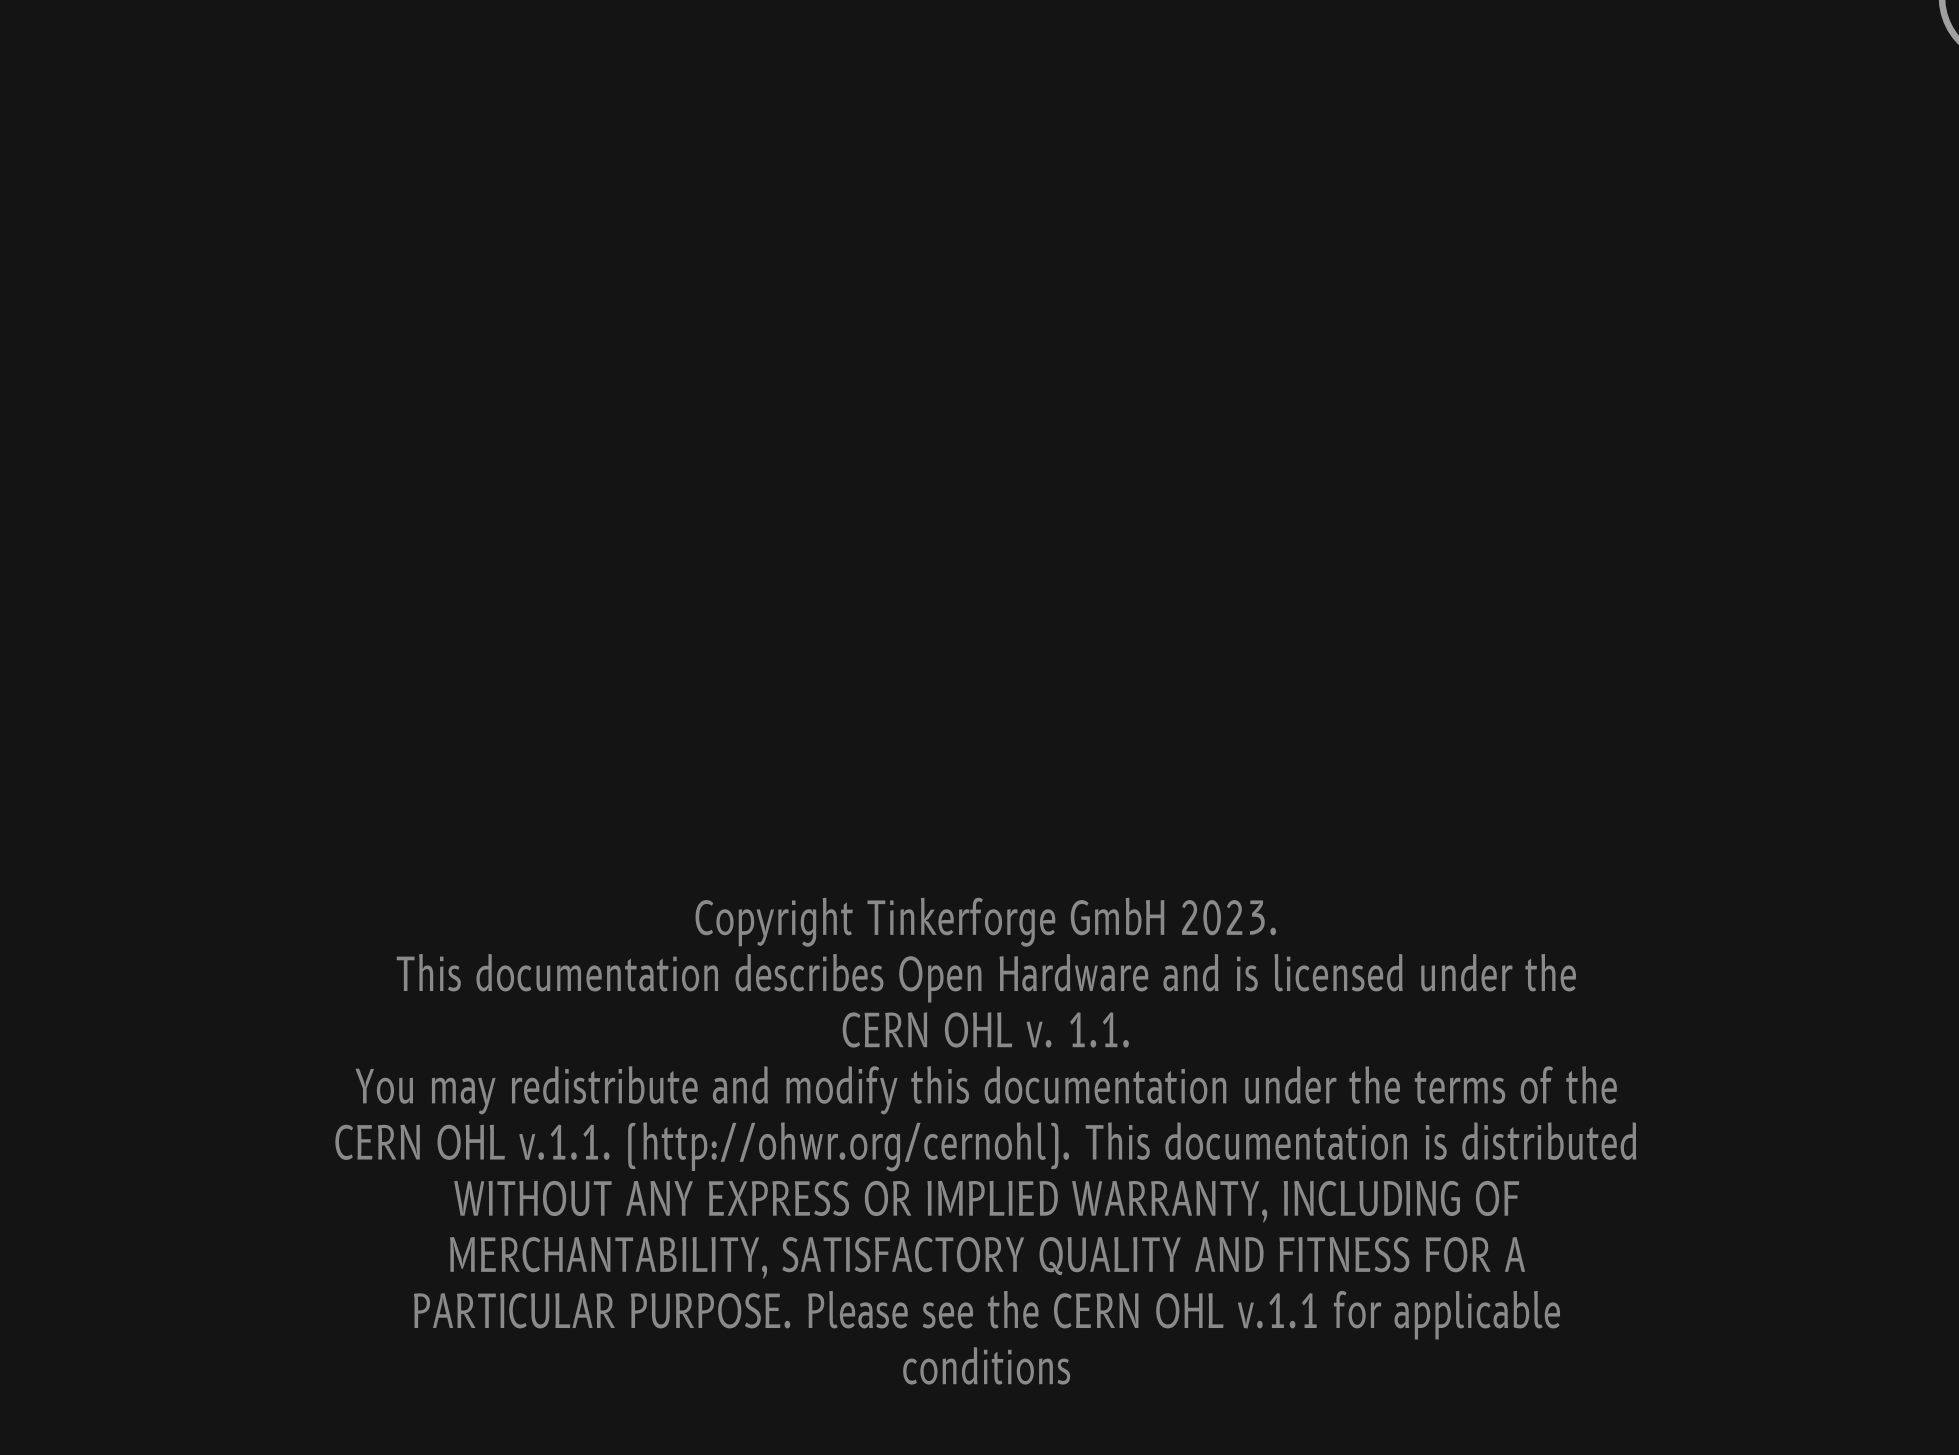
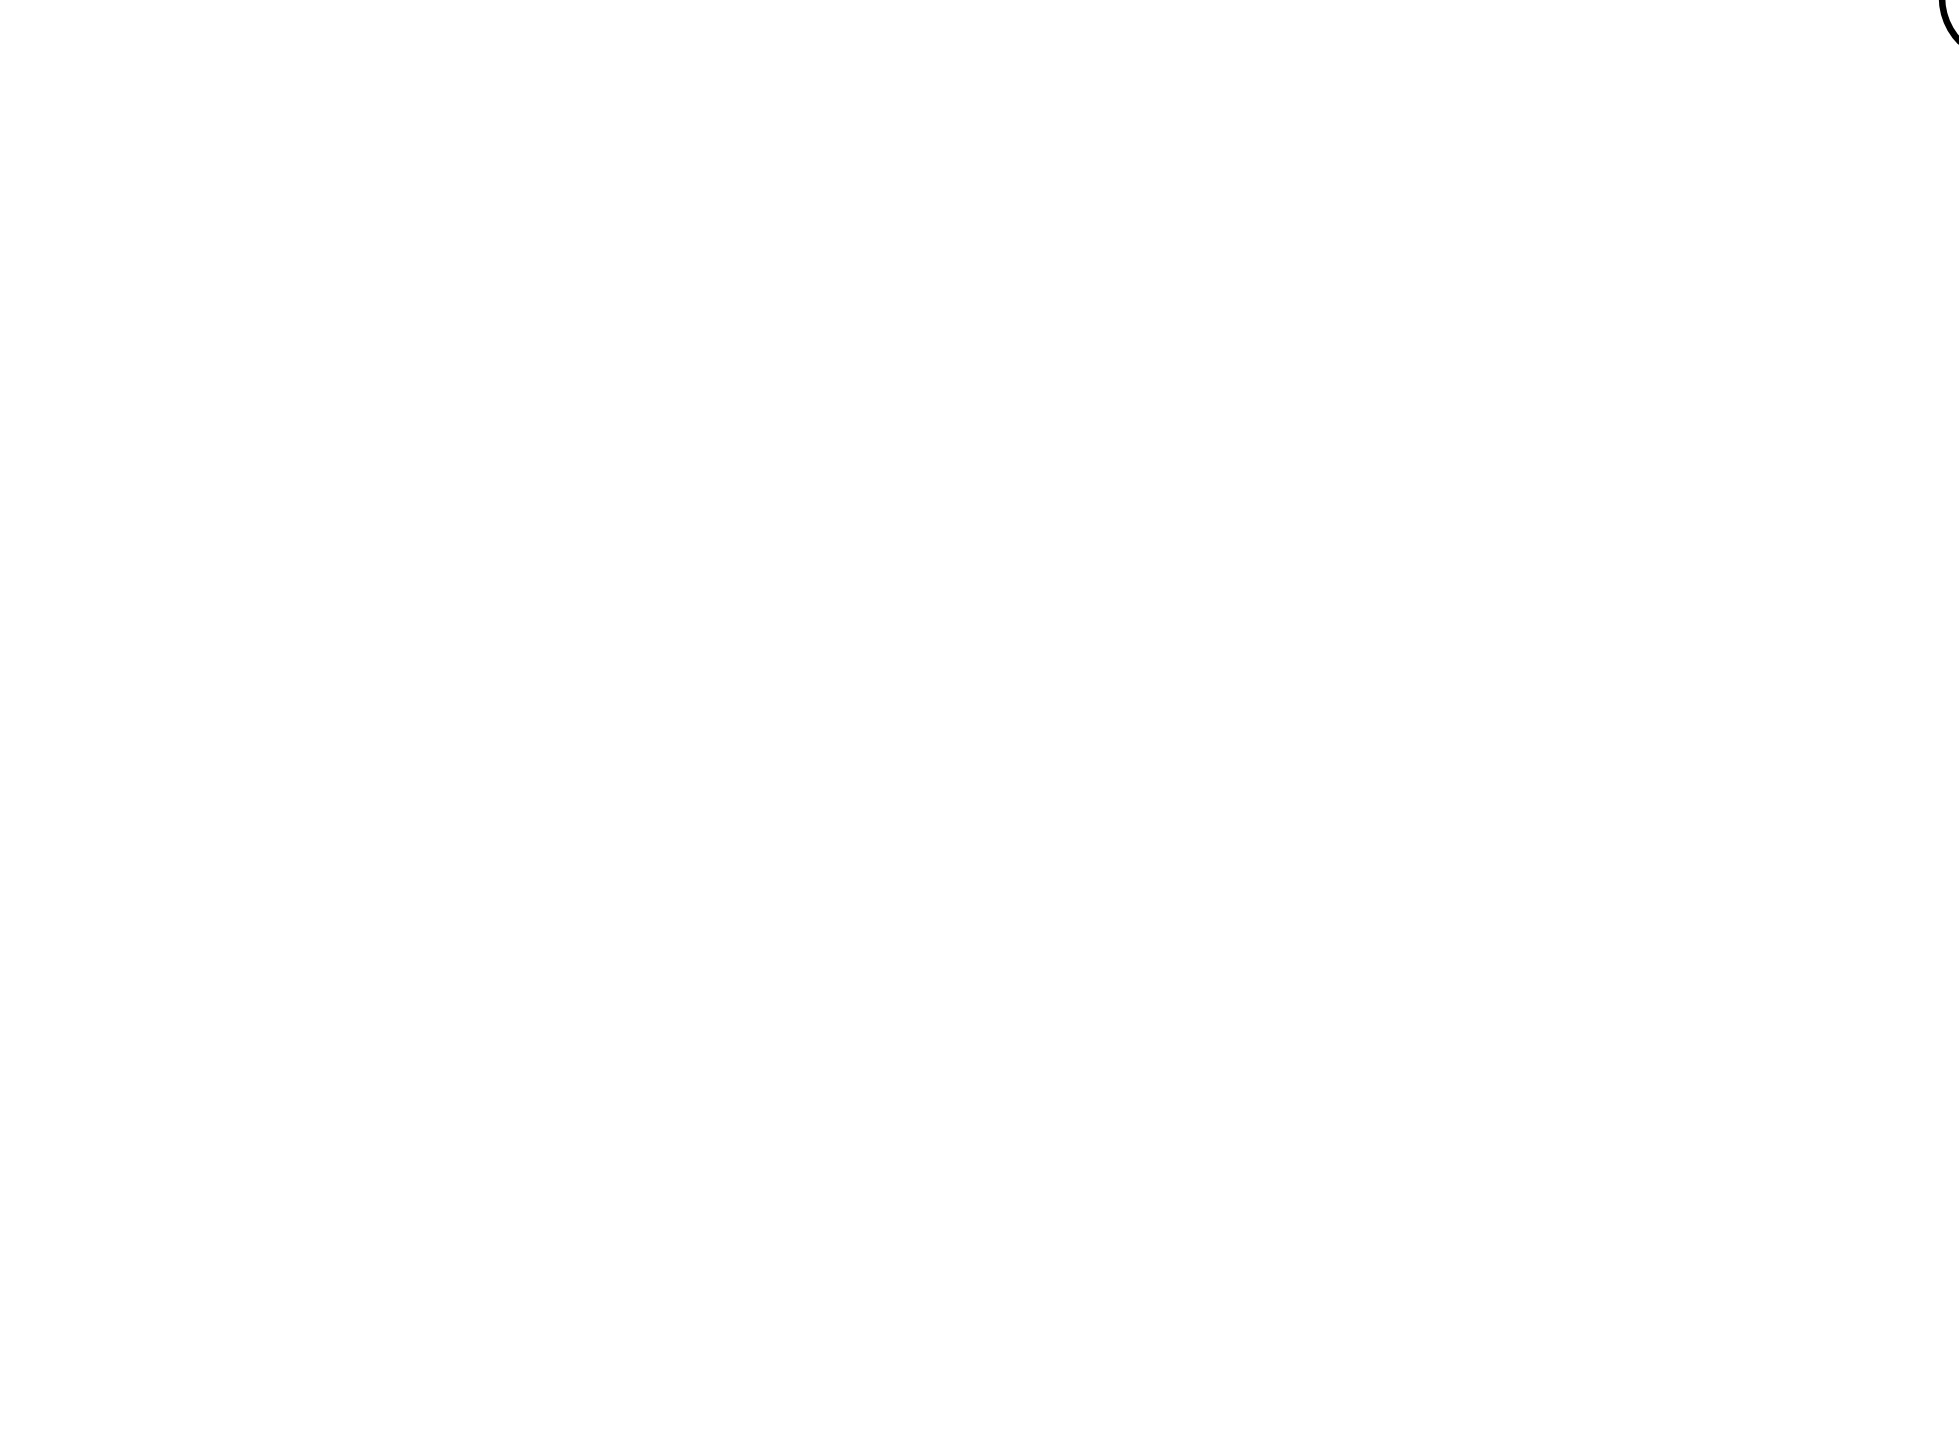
text: Copyright Tinkerforge GmbH 2023. (985, 922) -> none
text: This documentation describes Open Hardware and is licensed under the (986, 978) -> none
text: CERN OHL v. 1.1. (985, 1029) -> none
text: You may redistribute and modify this documentation under the terms of the (986, 1090) -> none
text: CERN OHL v.1.1. (http://ohwr.org/cernohl). This documentation is distributed (985, 1146) -> none
text: WITHOUT ANY EXPRESS OR IMPLIED WARRANTY, INCLUDING OF (986, 1201) -> none
text: MERCHANTABILITY, SATISFACTORY QUALITY AND FITNESS FOR A (987, 1257) -> none
text: PARTICULAR PURPOSE. Please see the CERN OHL v.1.1 for applicable (986, 1315) -> none
text: conditions (986, 1365) -> none

